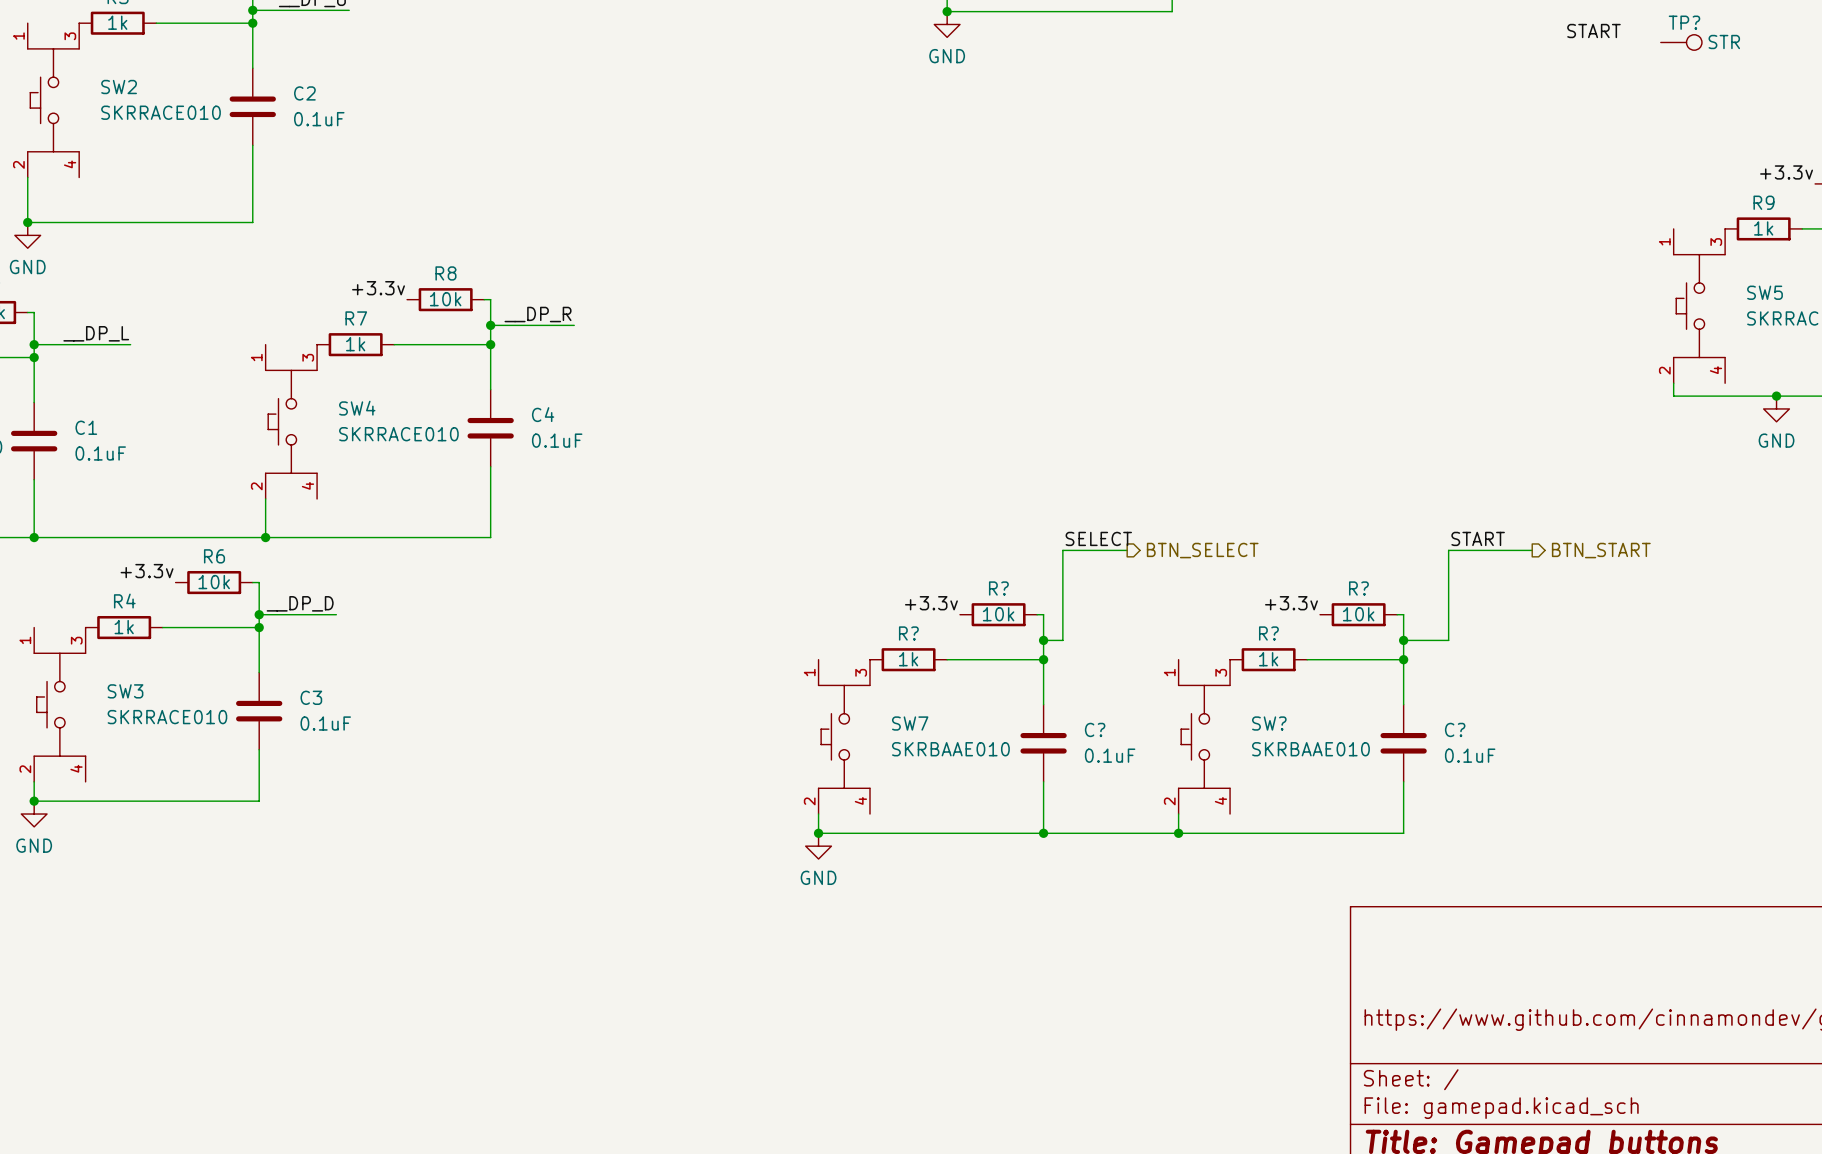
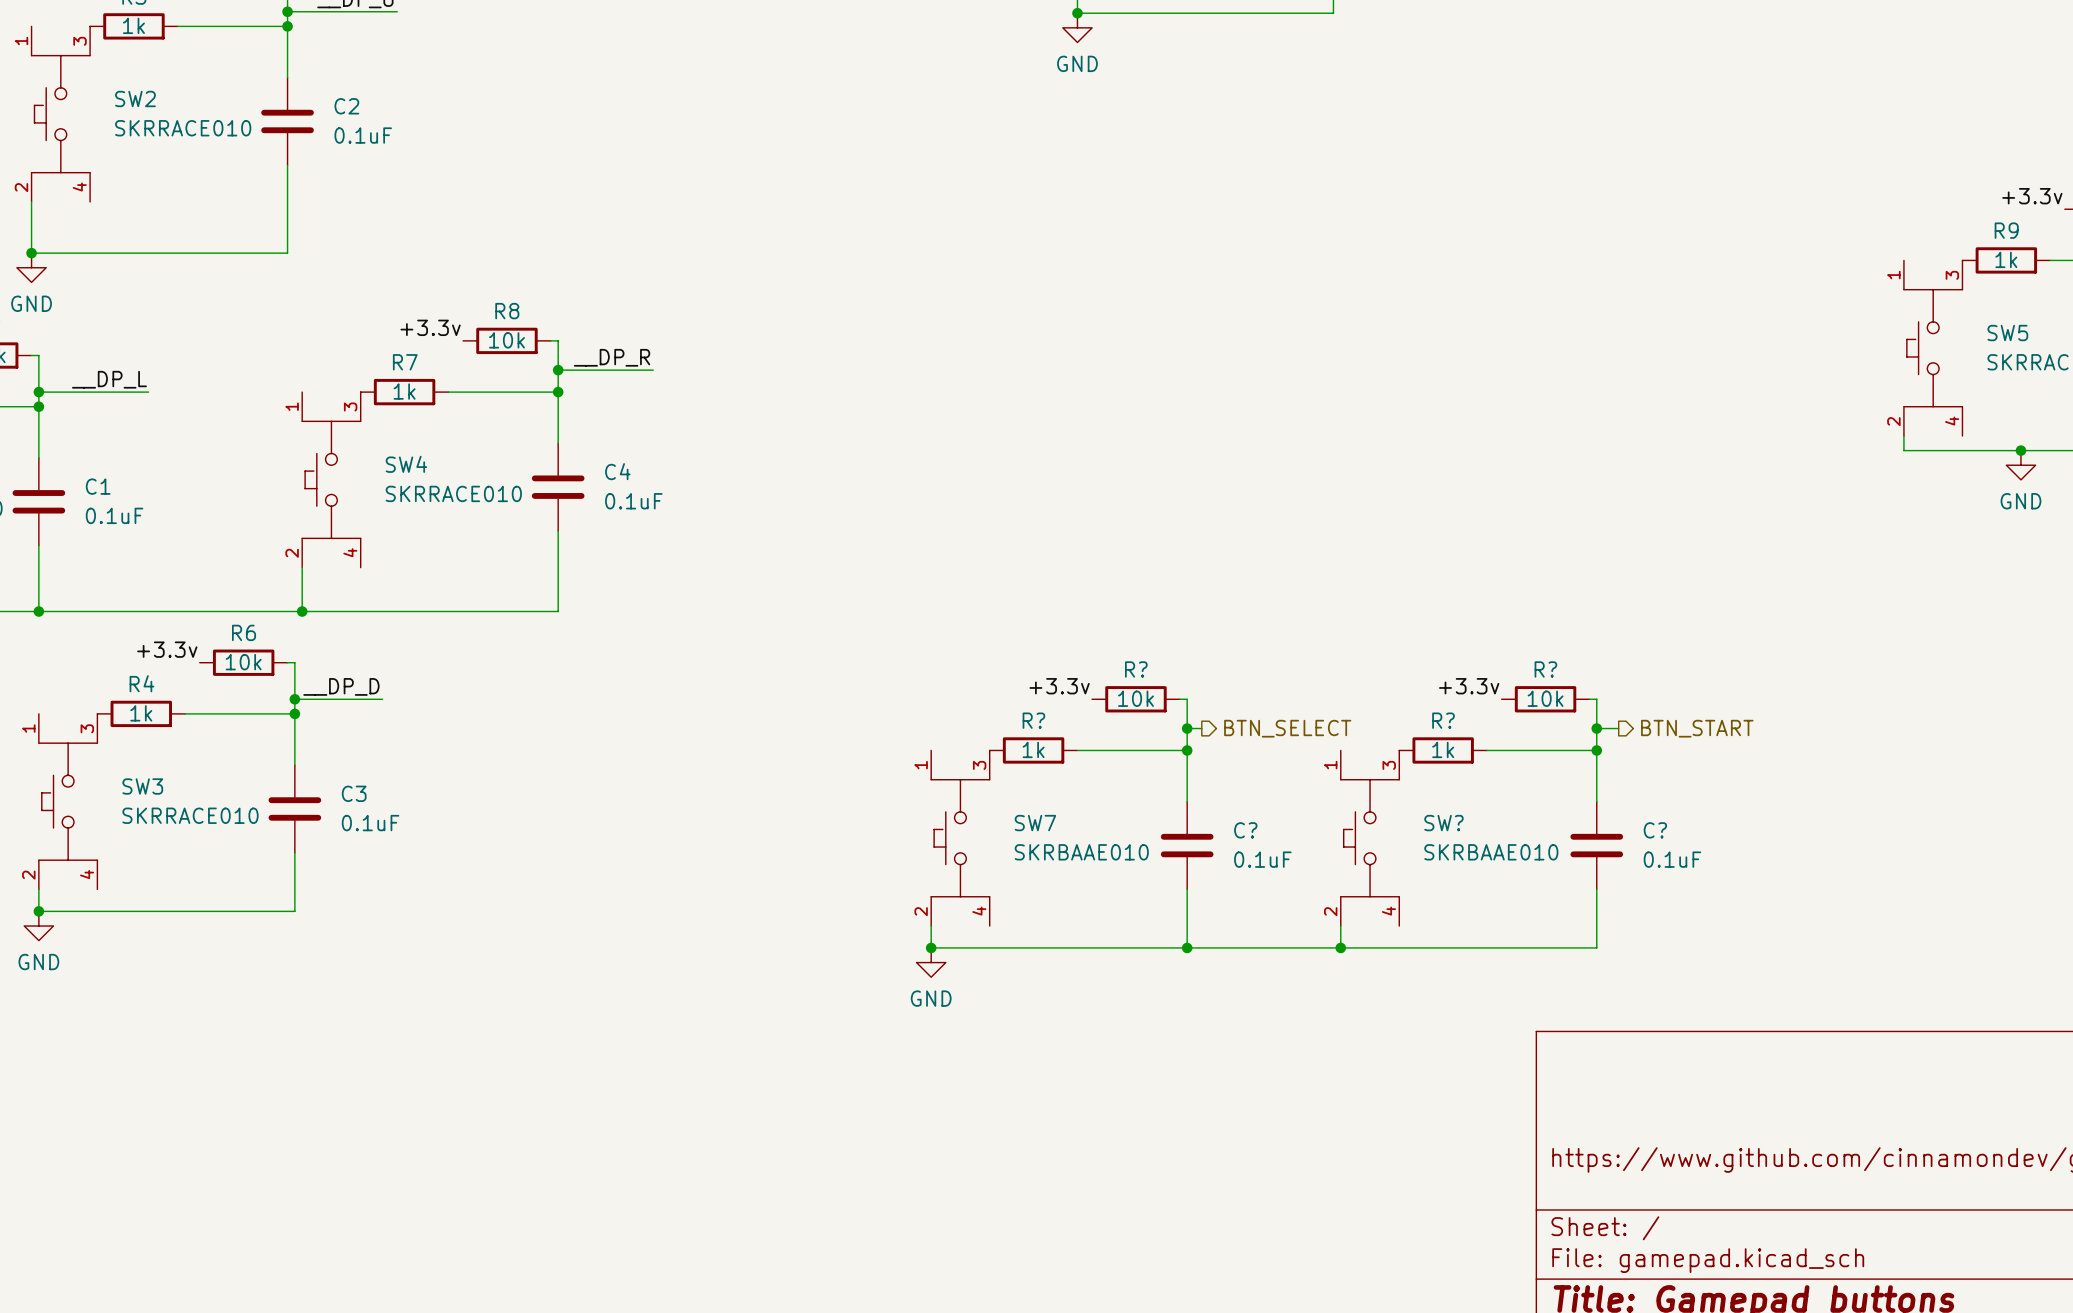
label: START (1593, 31) -> none
TP?: STR (1681, 42) -> none
label: SELECT (1098, 538) -> none
label: START (1478, 538) -> none
wire: (1127, 550) (1062, 550) (1062, 640) (1056, 640) -> none
hierarchical label position: BTN_SELECT (1202, 550) -> BTN_SELECT (1287, 728)
wire: (1532, 550) (1448, 550) (1448, 640) (1422, 640) -> none
hierarchical label position: BTN_START (1601, 550) -> BTN_START (1697, 728)

